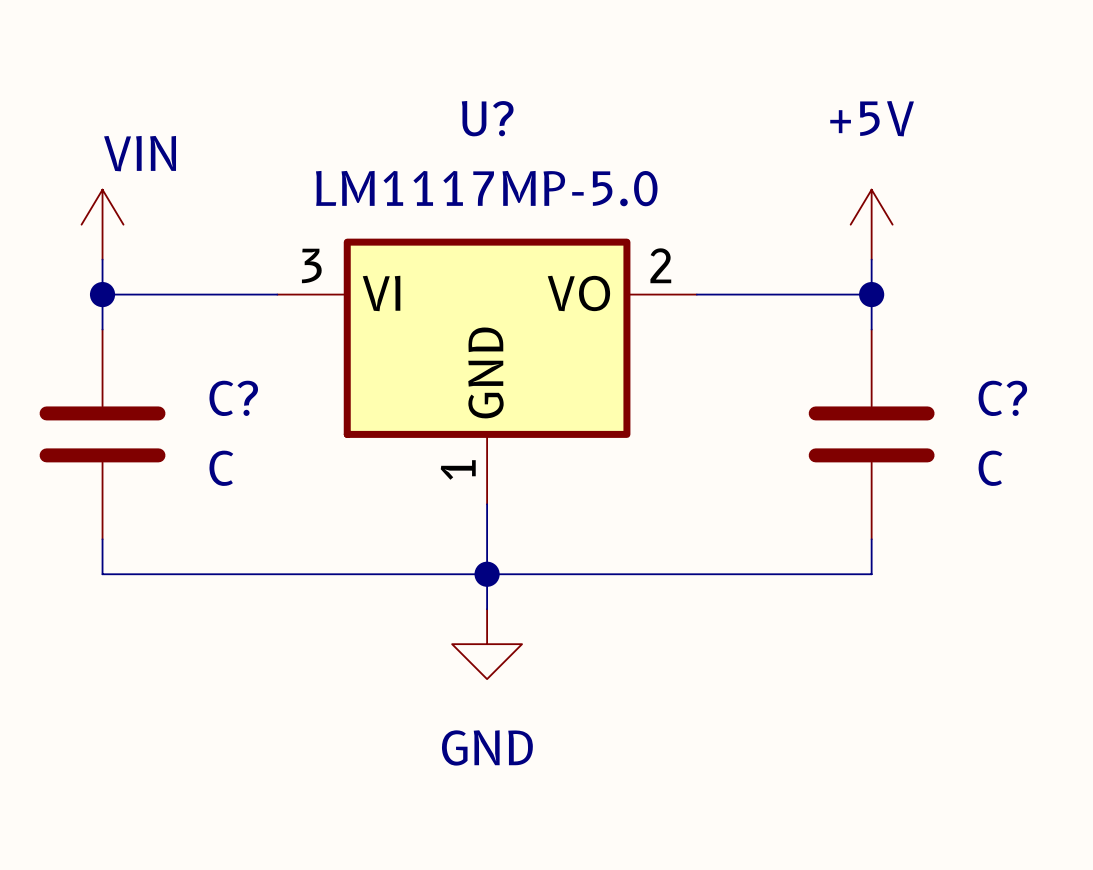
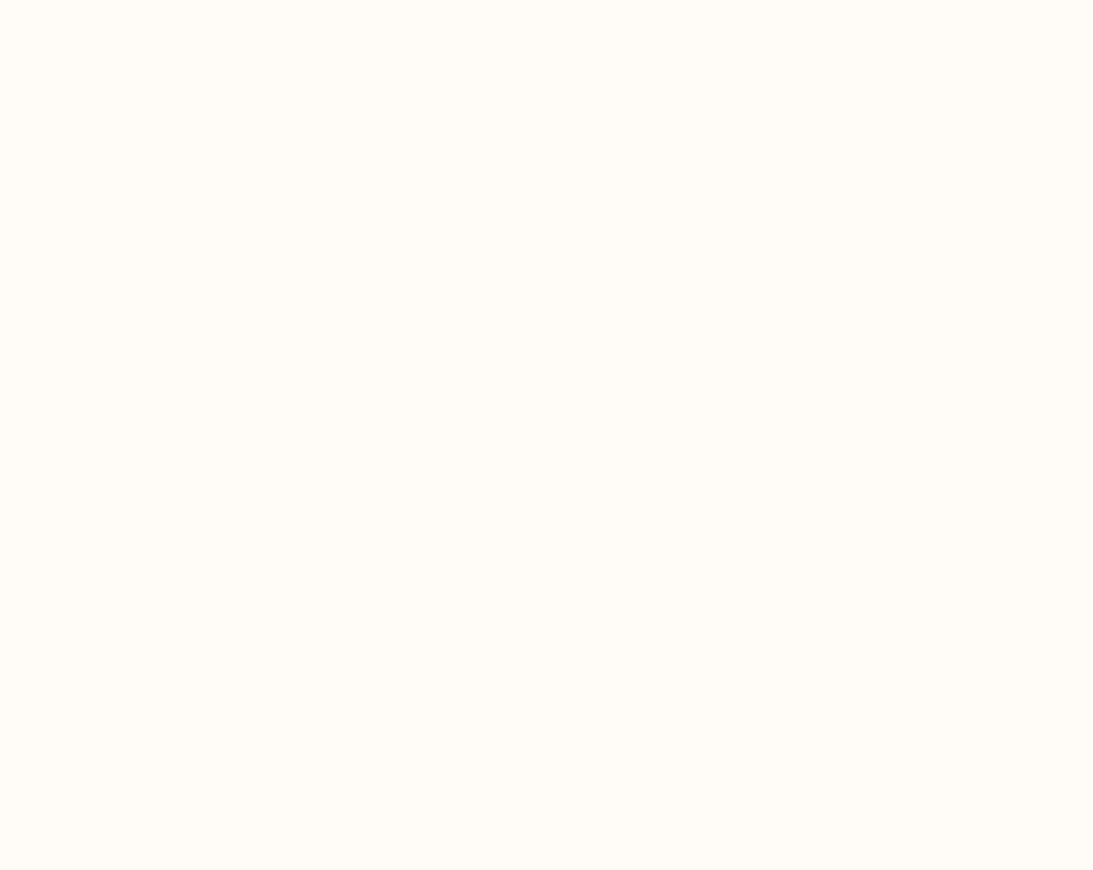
power symbol: VIN (102, 224) -> none
power symbol: +5V (871, 224) -> none
wire: (102, 259) (102, 329) -> none
wire: (871, 259) (871, 329) -> none
wire: (102, 294) (277, 294) -> none
junction: (102, 294) -> none
wire: (696, 294) (871, 294) -> none
junction: (871, 294) -> none
U?: LM1117MP-5.0 (487, 371) -> none
C?: C (102, 434) -> none
C?: C (871, 434) -> none
wire: (487, 504) (487, 609) -> none
wire: (102, 539) (102, 574) (871, 574) (871, 539) -> none
junction: (487, 574) -> none
power symbol: GND (487, 644) -> none

